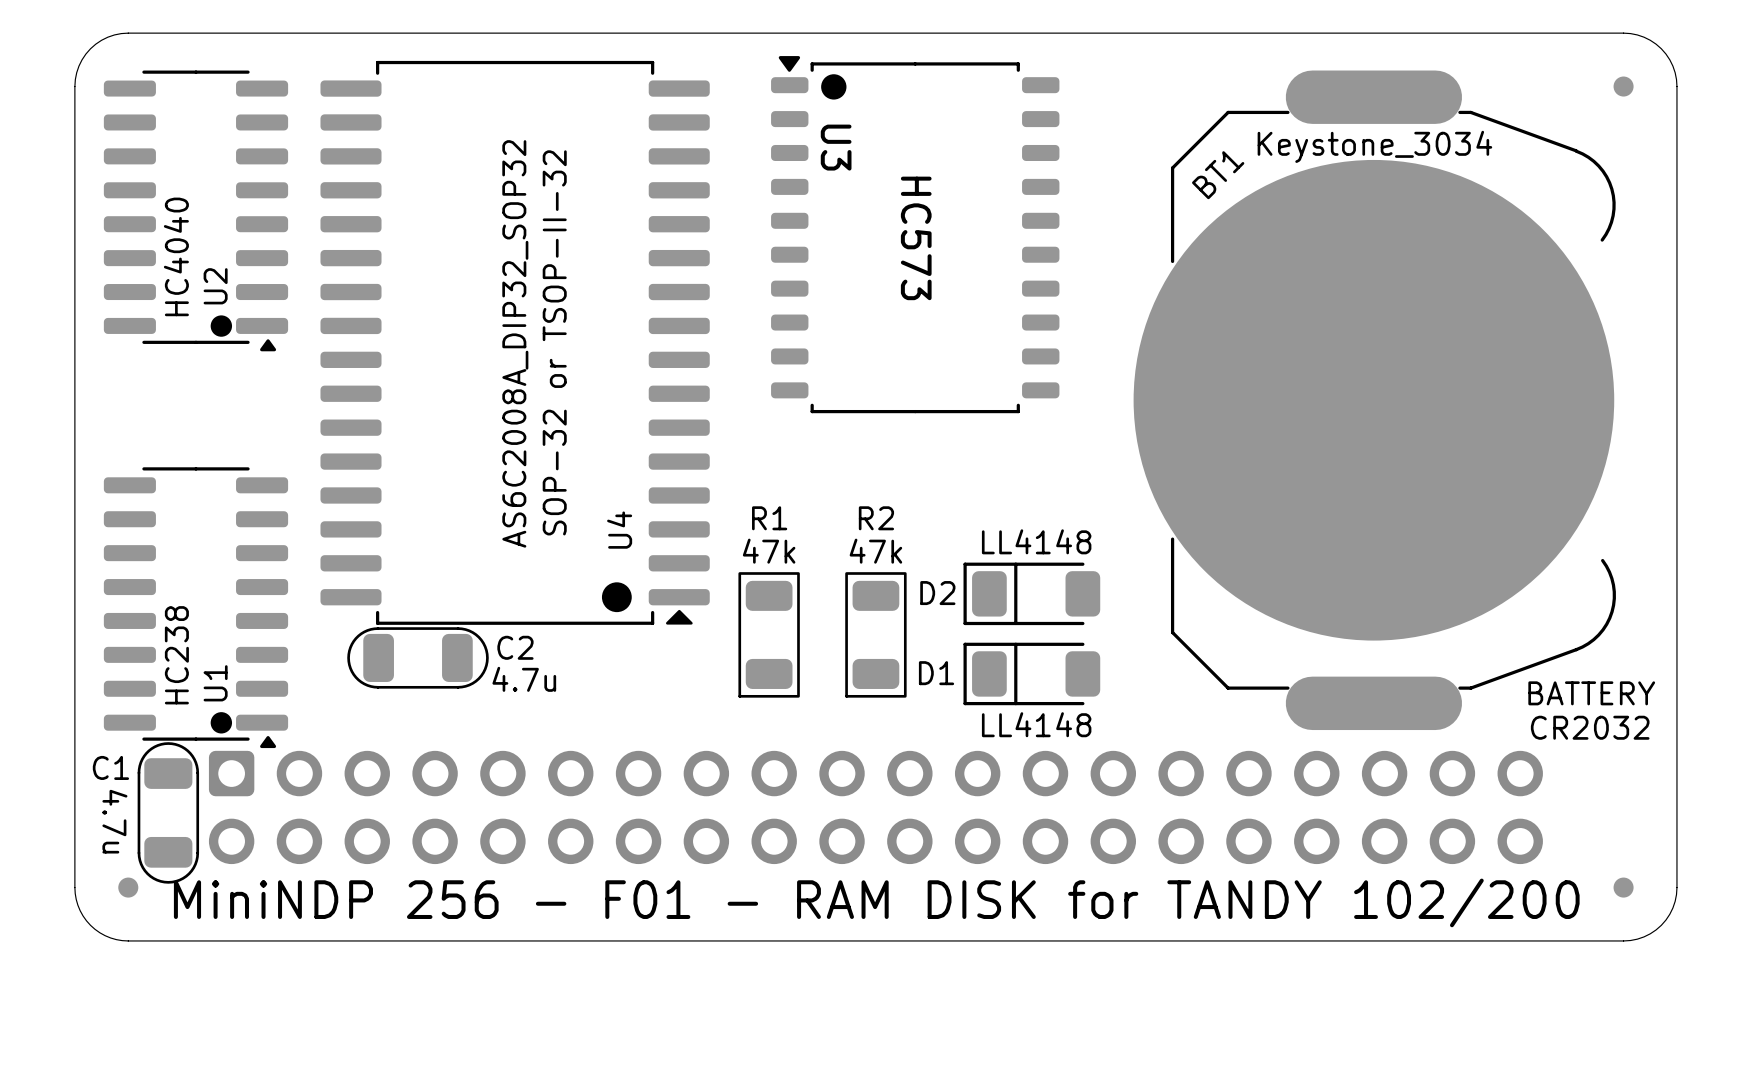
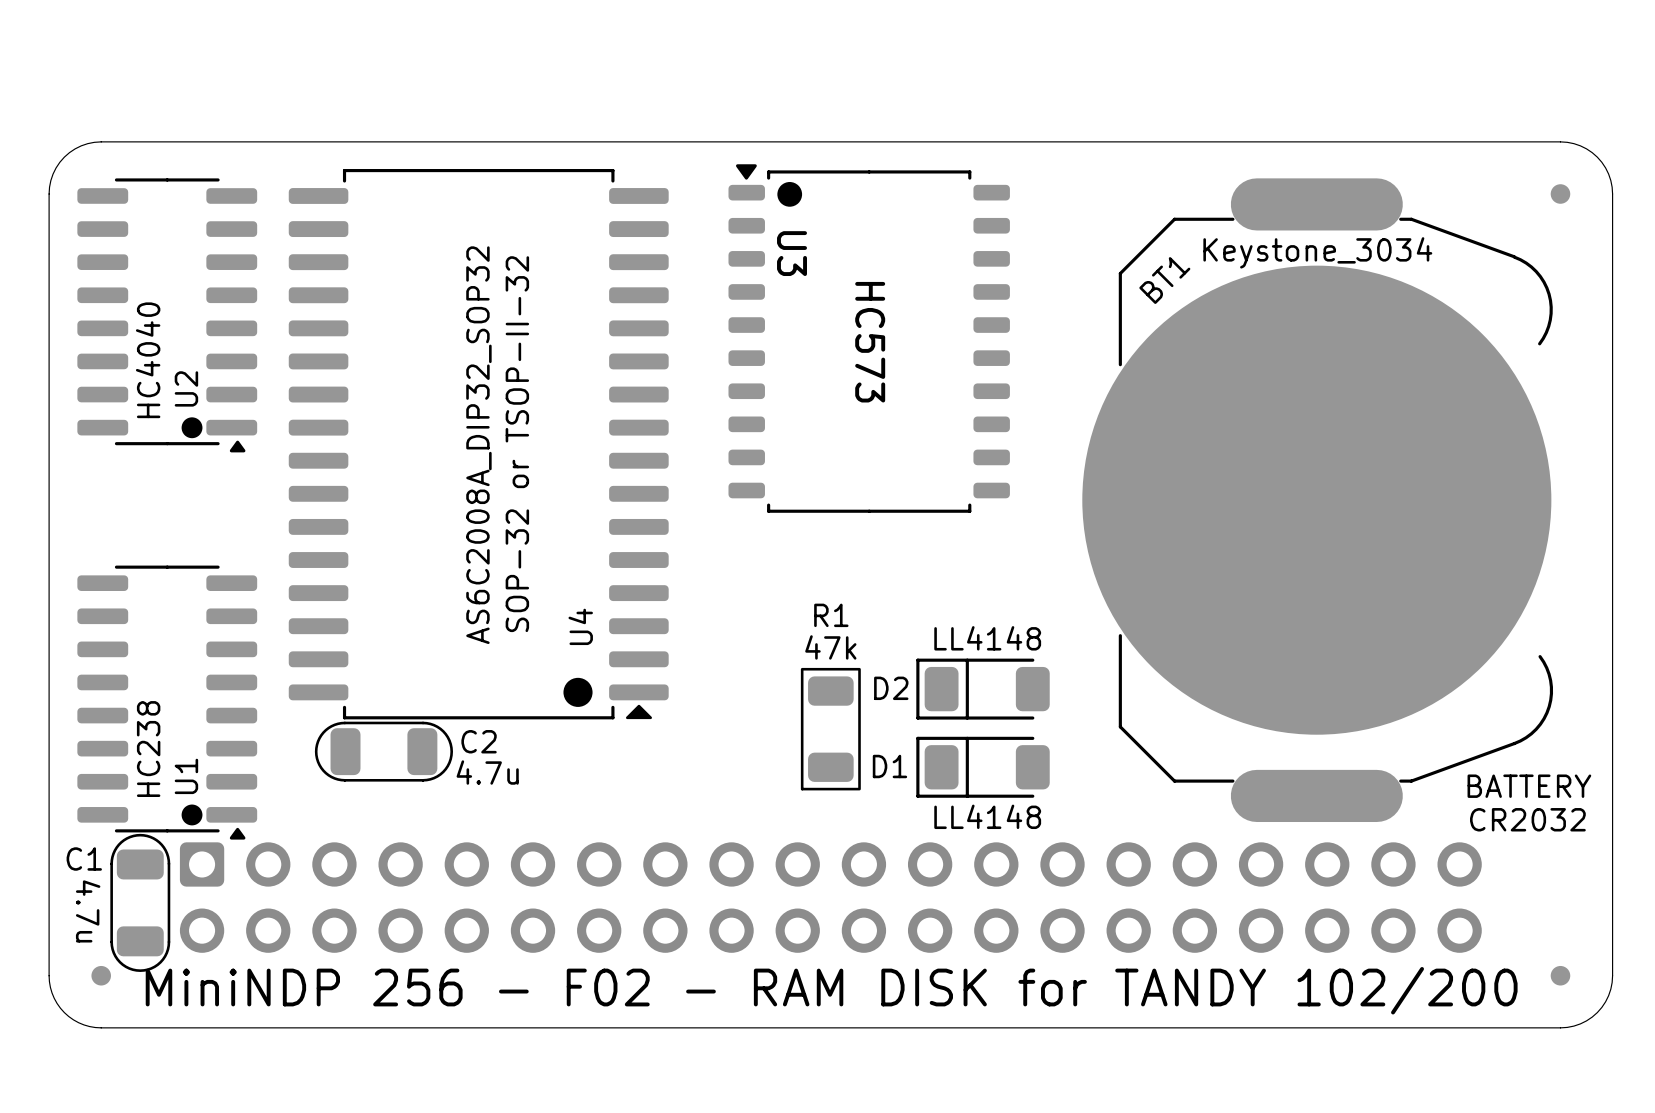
R2 name: R2 (876, 518) -> R1 (831, 615)
R1: 47k (769, 634) -> none
text: MiniNDP 256 - F01 - RAM DISK for TANDY 102/200 (876, 902) -> MiniNDP 256 - F02 - RAM DISK for TANDY 102/200 (831, 990)

